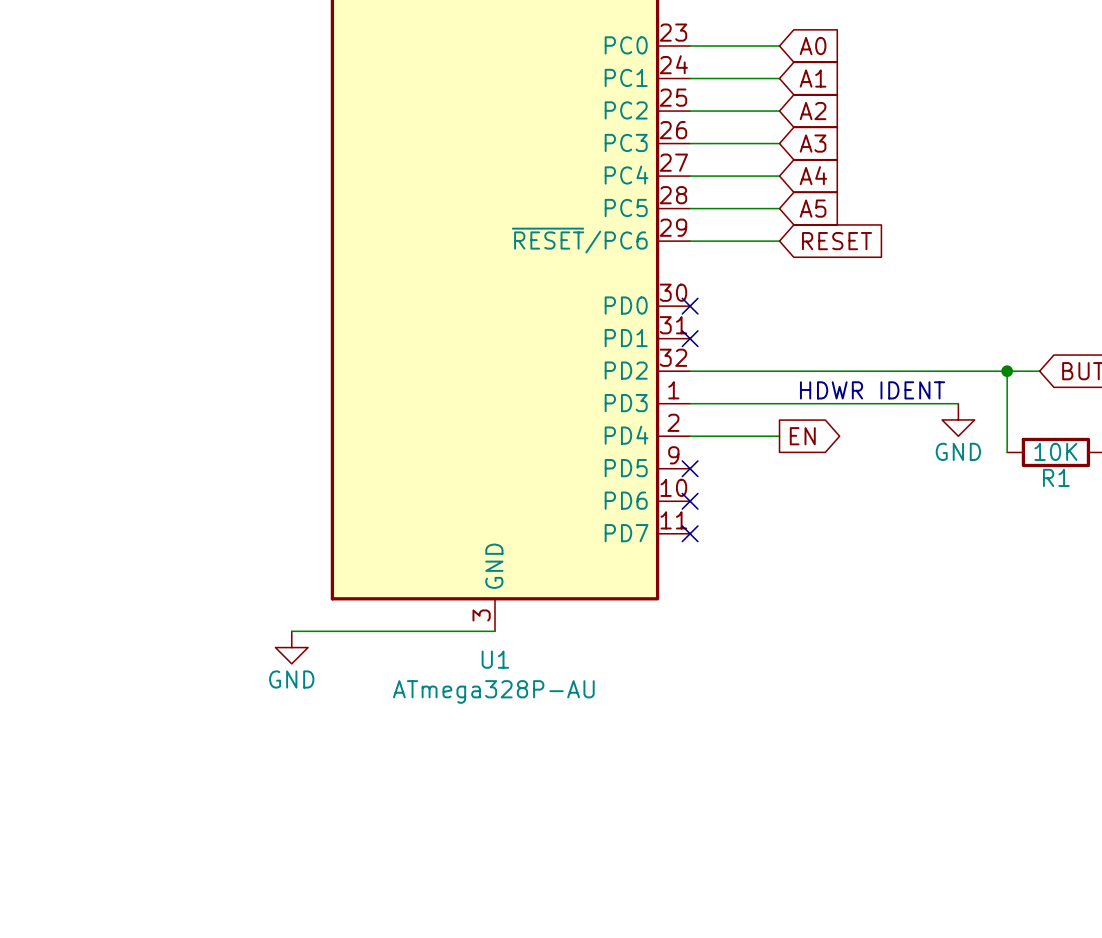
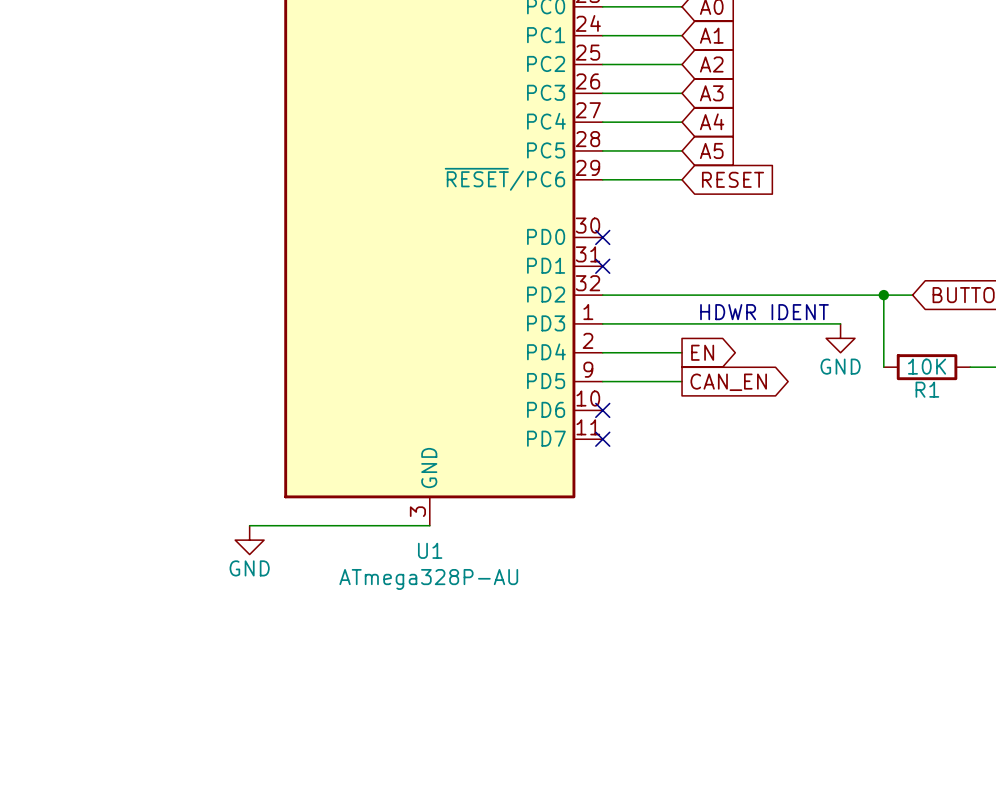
wire: none -> (602, 381) (682, 381)
no-connect mark: (690, 468) -> none
global label: none -> CAN_EN (728, 382)

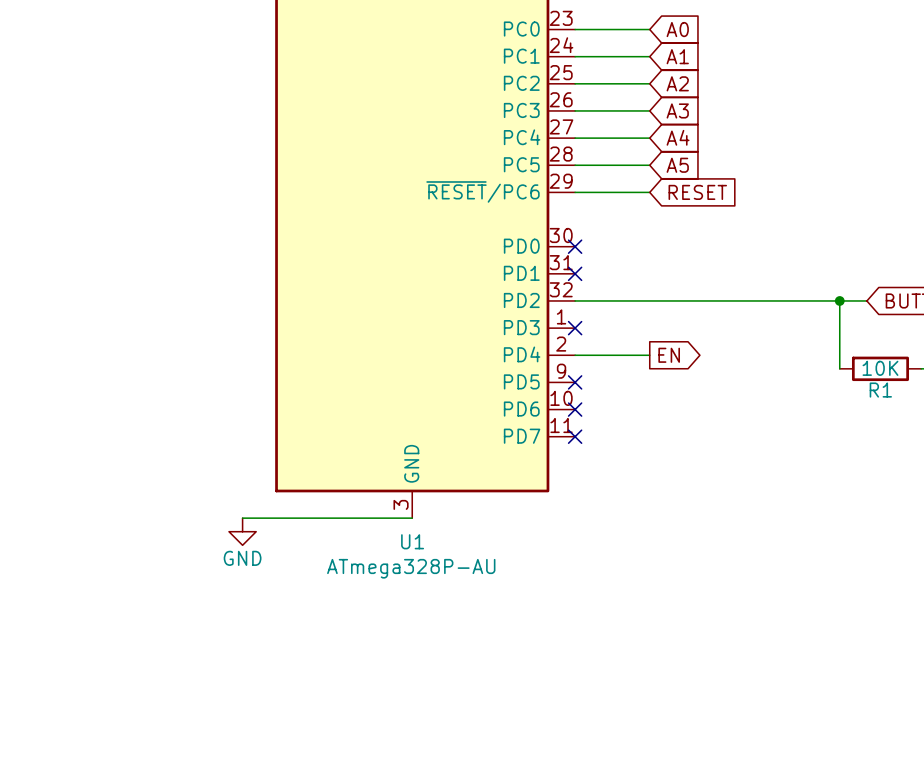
text: HDWR IDENT (764, 312) -> none
wire: (602, 323) (840, 323) -> none
no-connect mark: none -> (575, 328)
power symbol: GND (840, 338) -> none
wire: (602, 381) (682, 381) -> none
no-connect mark: none -> (575, 382)
global label: CAN_EN (728, 382) -> none

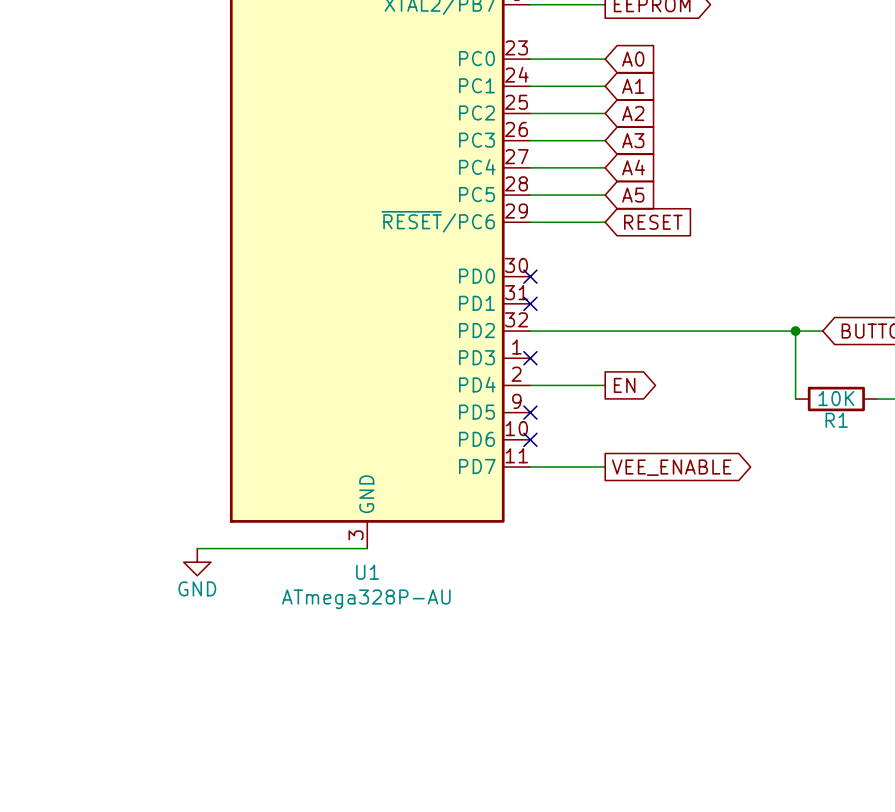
wire: none -> (530, 467) (605, 467)
no-connect mark: (575, 436) -> none
global label: none -> VEE_ENABLE (671, 467)

